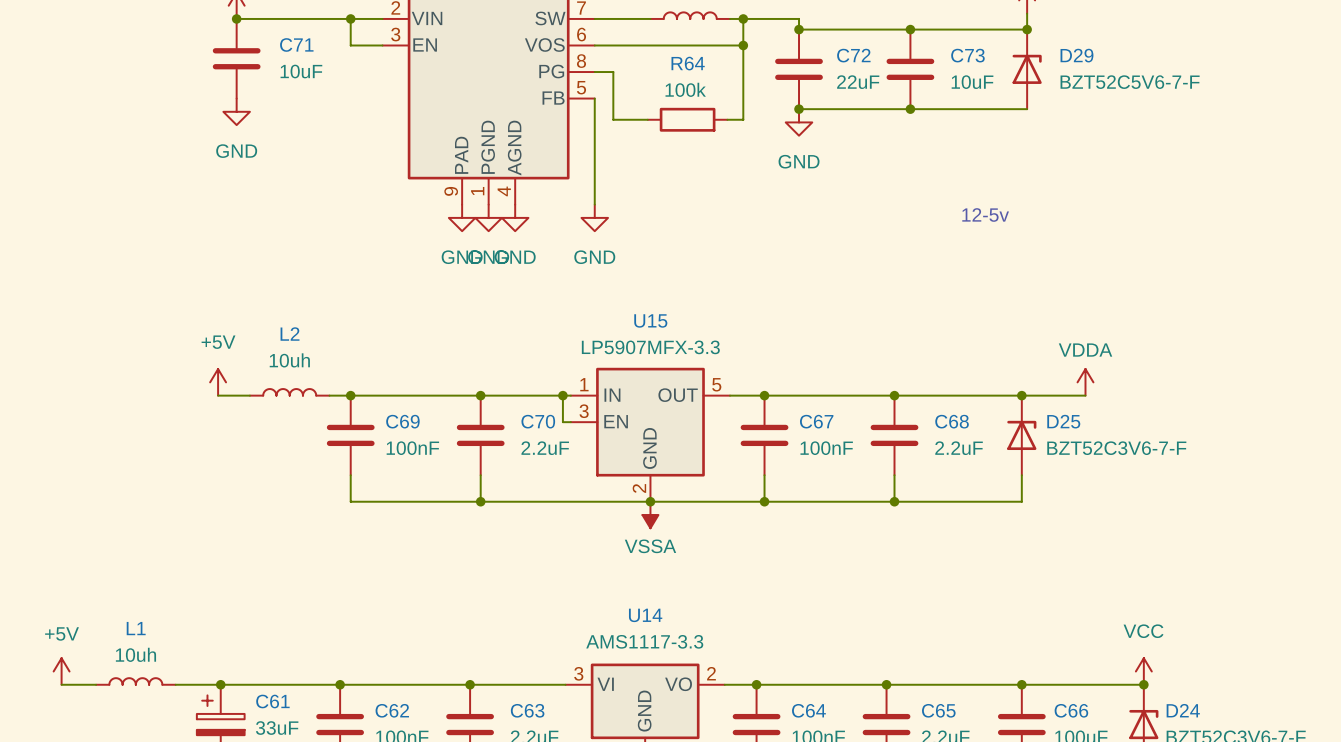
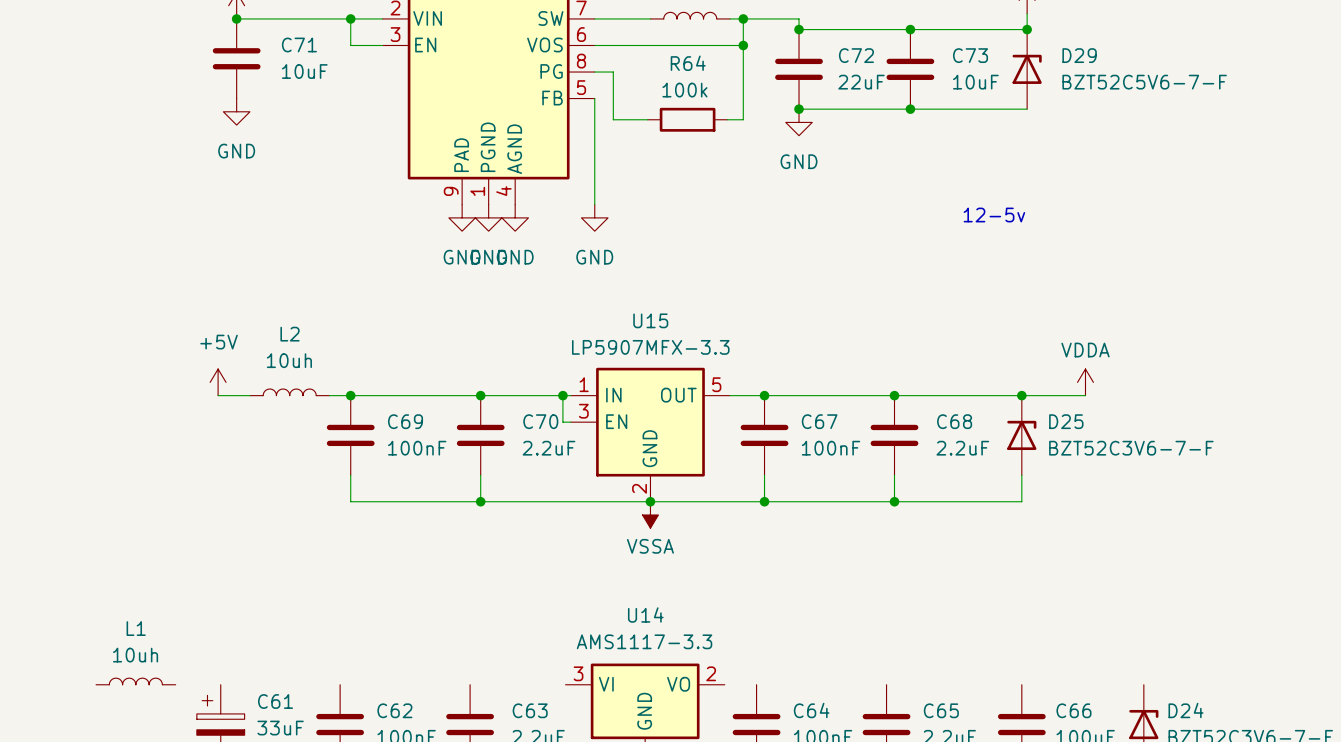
power symbol: +5V (61, 671) -> none
power symbol: VCC (1143, 671) -> none
wire: (61, 684) (96, 684) -> none
wire: (175, 684) (565, 684) -> none
junction: (220, 684) -> none
junction: (340, 684) -> none
junction: (470, 684) -> none
wire: (724, 684) (1143, 684) -> none
junction: (756, 684) -> none
junction: (886, 684) -> none
junction: (1021, 684) -> none
junction: (1143, 684) -> none

